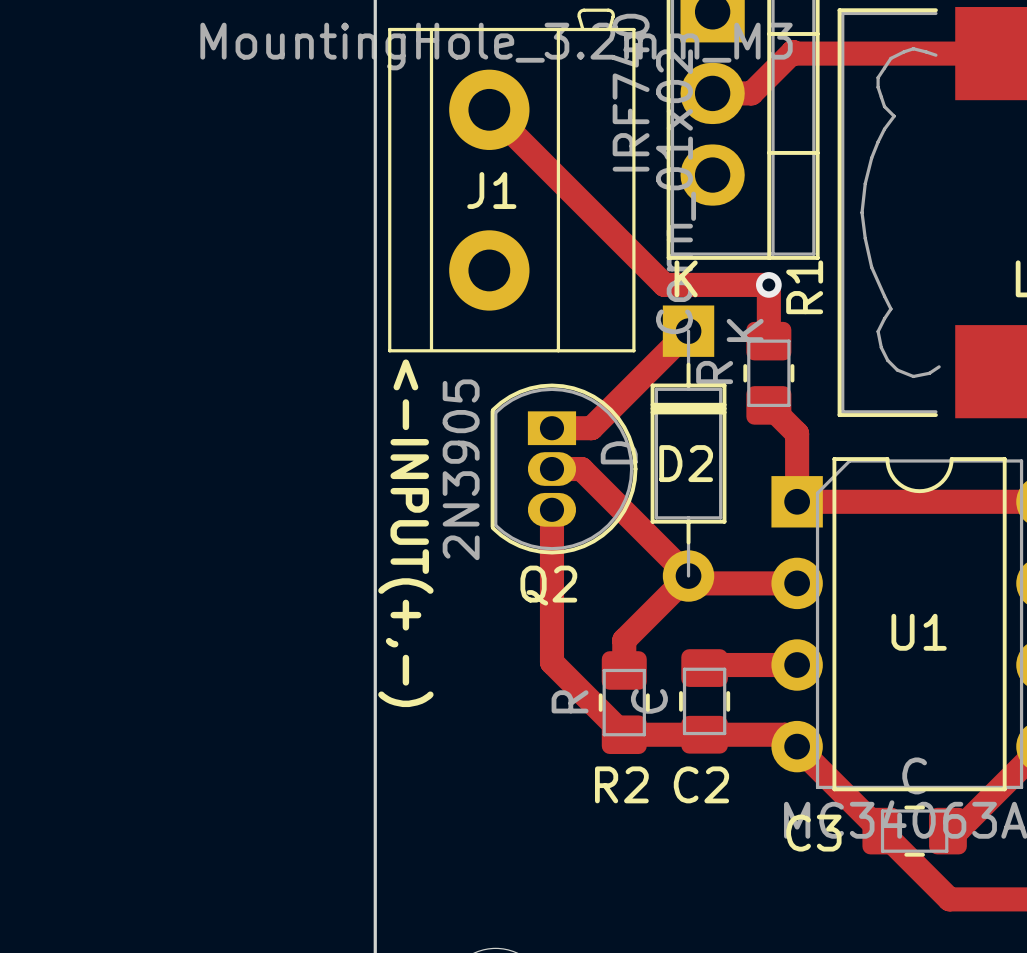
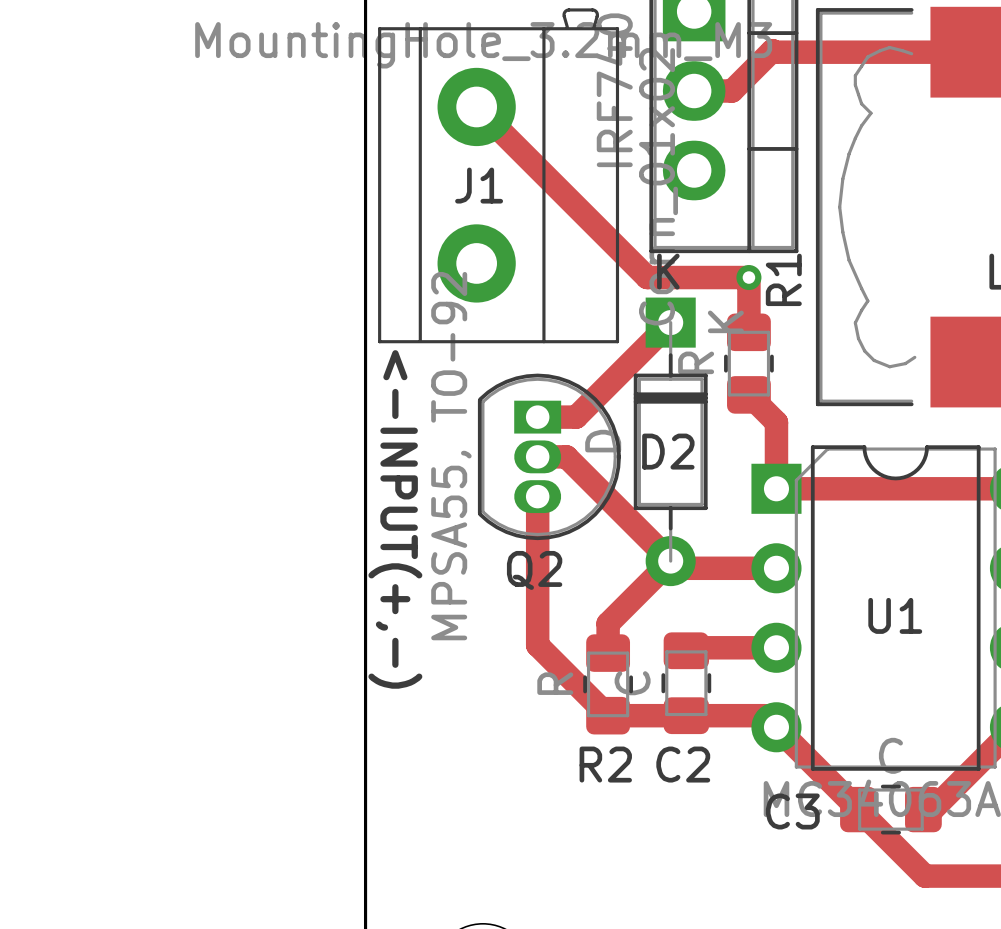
Q2 value: 2N3905 (461, 469) -> MPSA55, TO-92 (451, 456)

